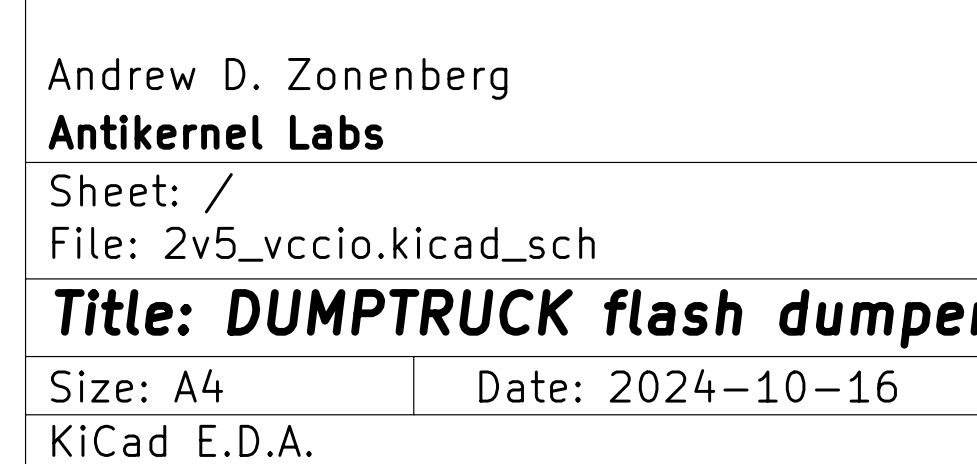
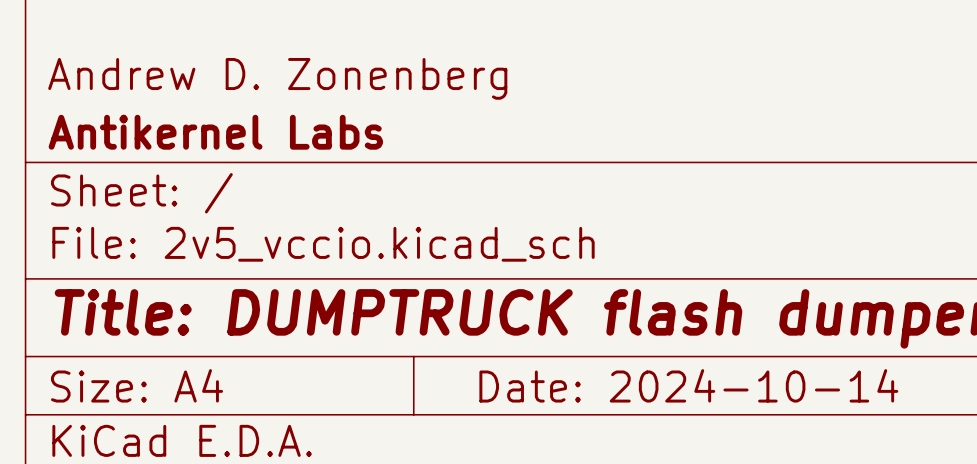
title block: Date: 2024-10-16 (688, 385) -> Date: 2024-10-14 (688, 385)

